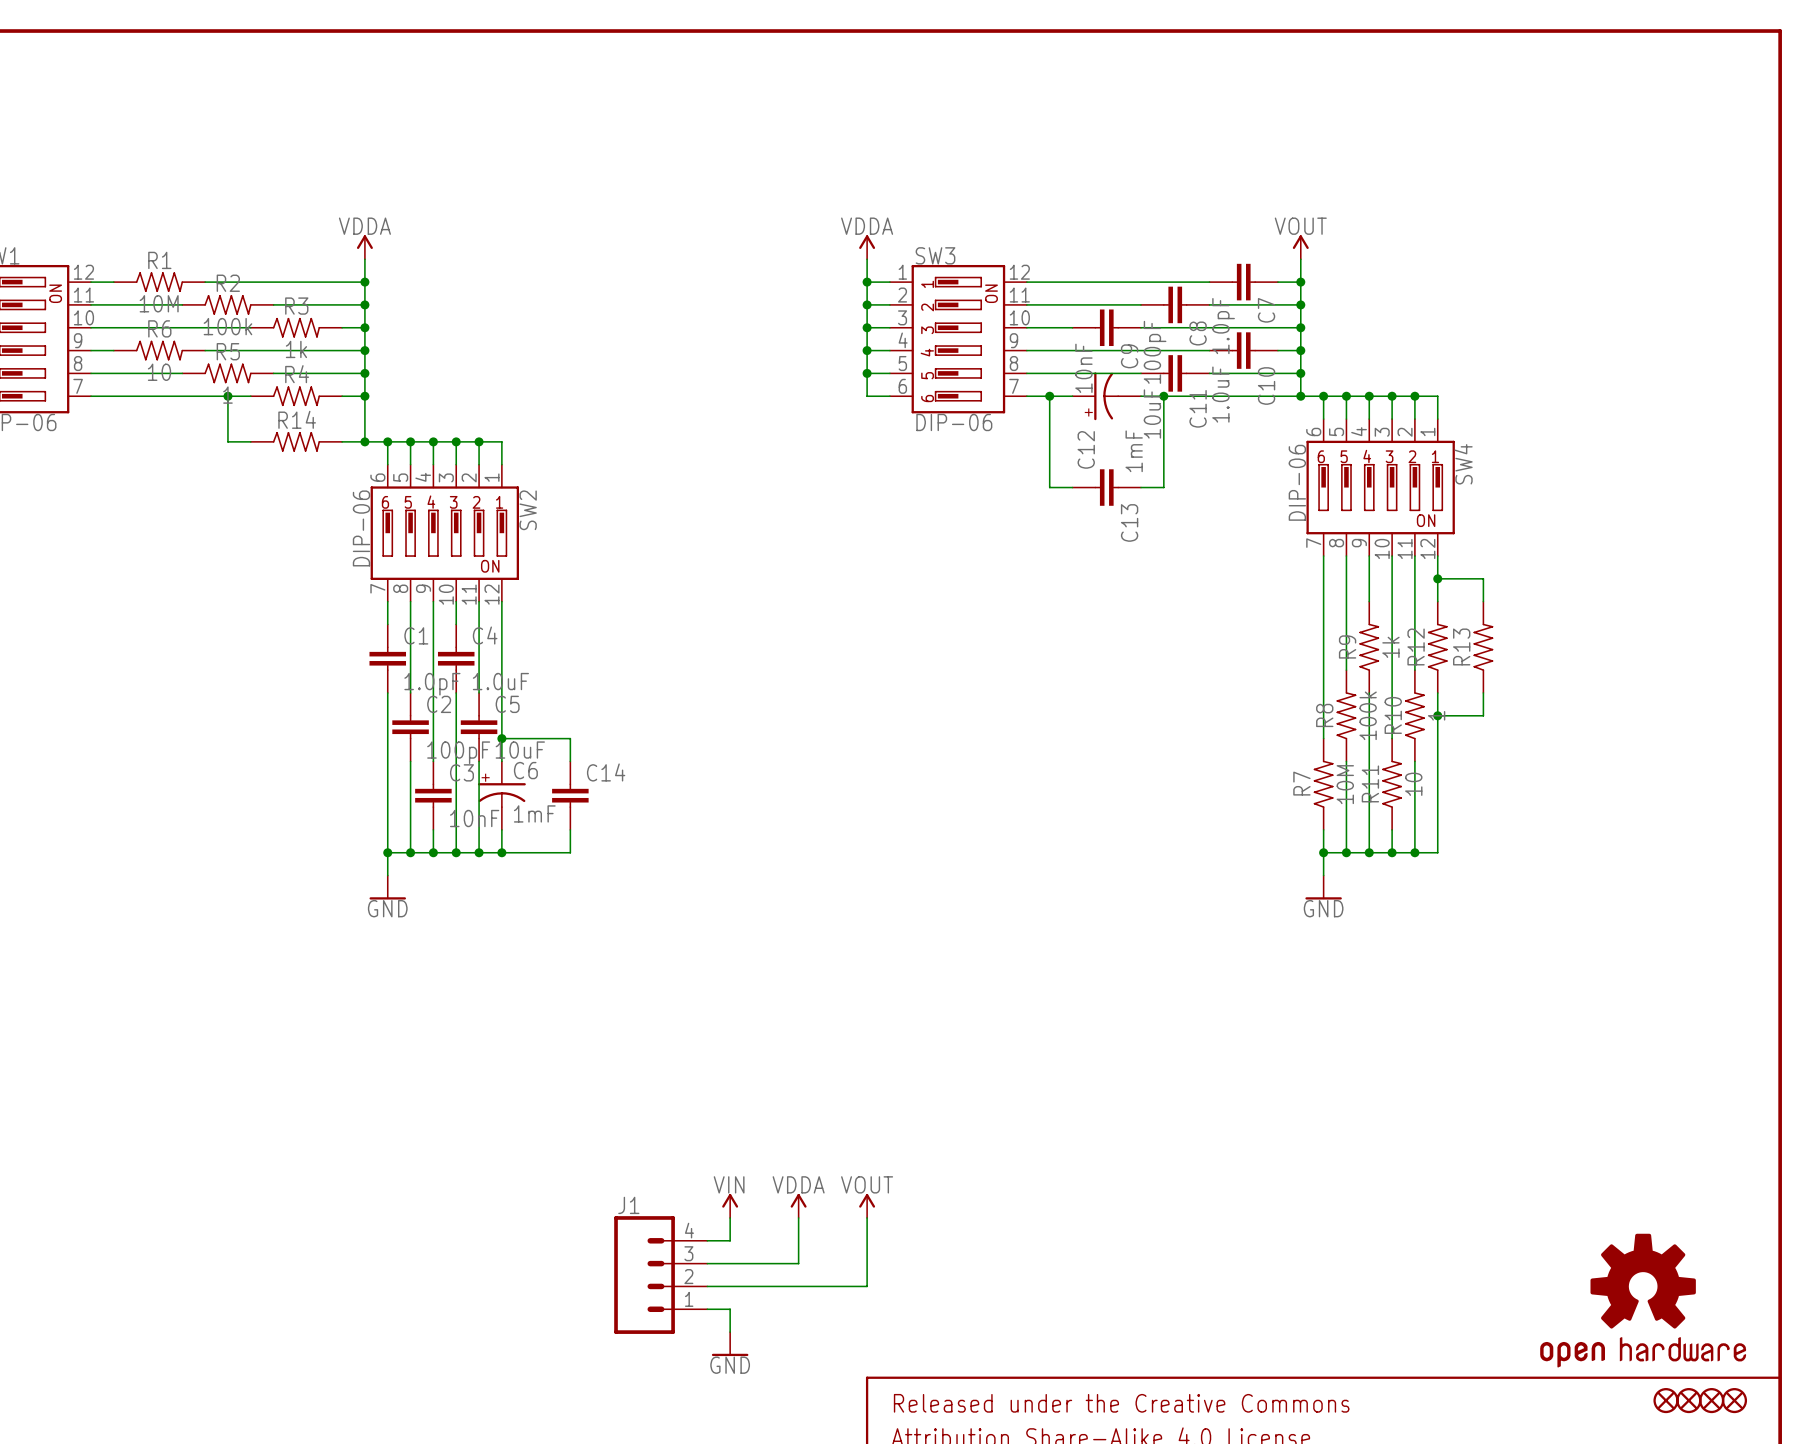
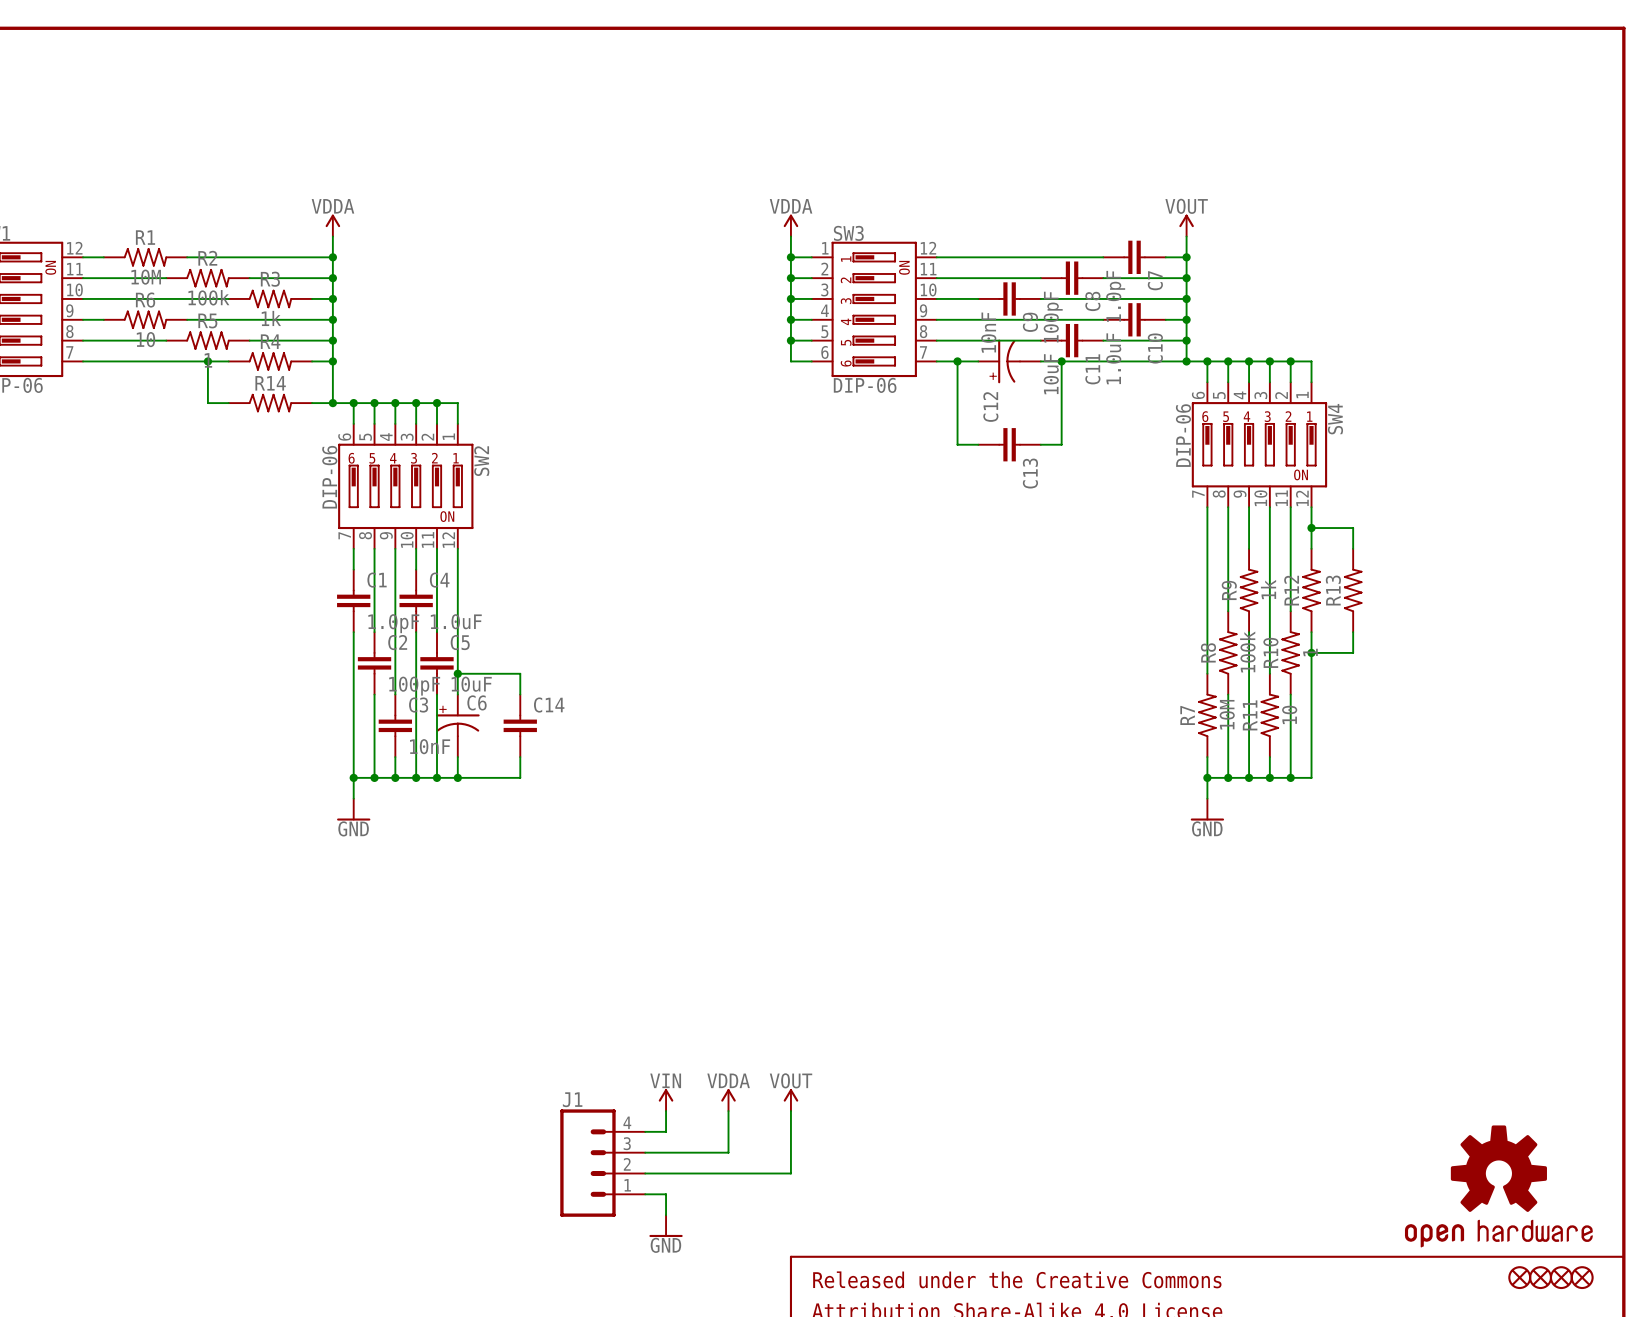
C12 value: 1mF (1134, 451) -> none
C6 value: 1mF (534, 813) -> none

